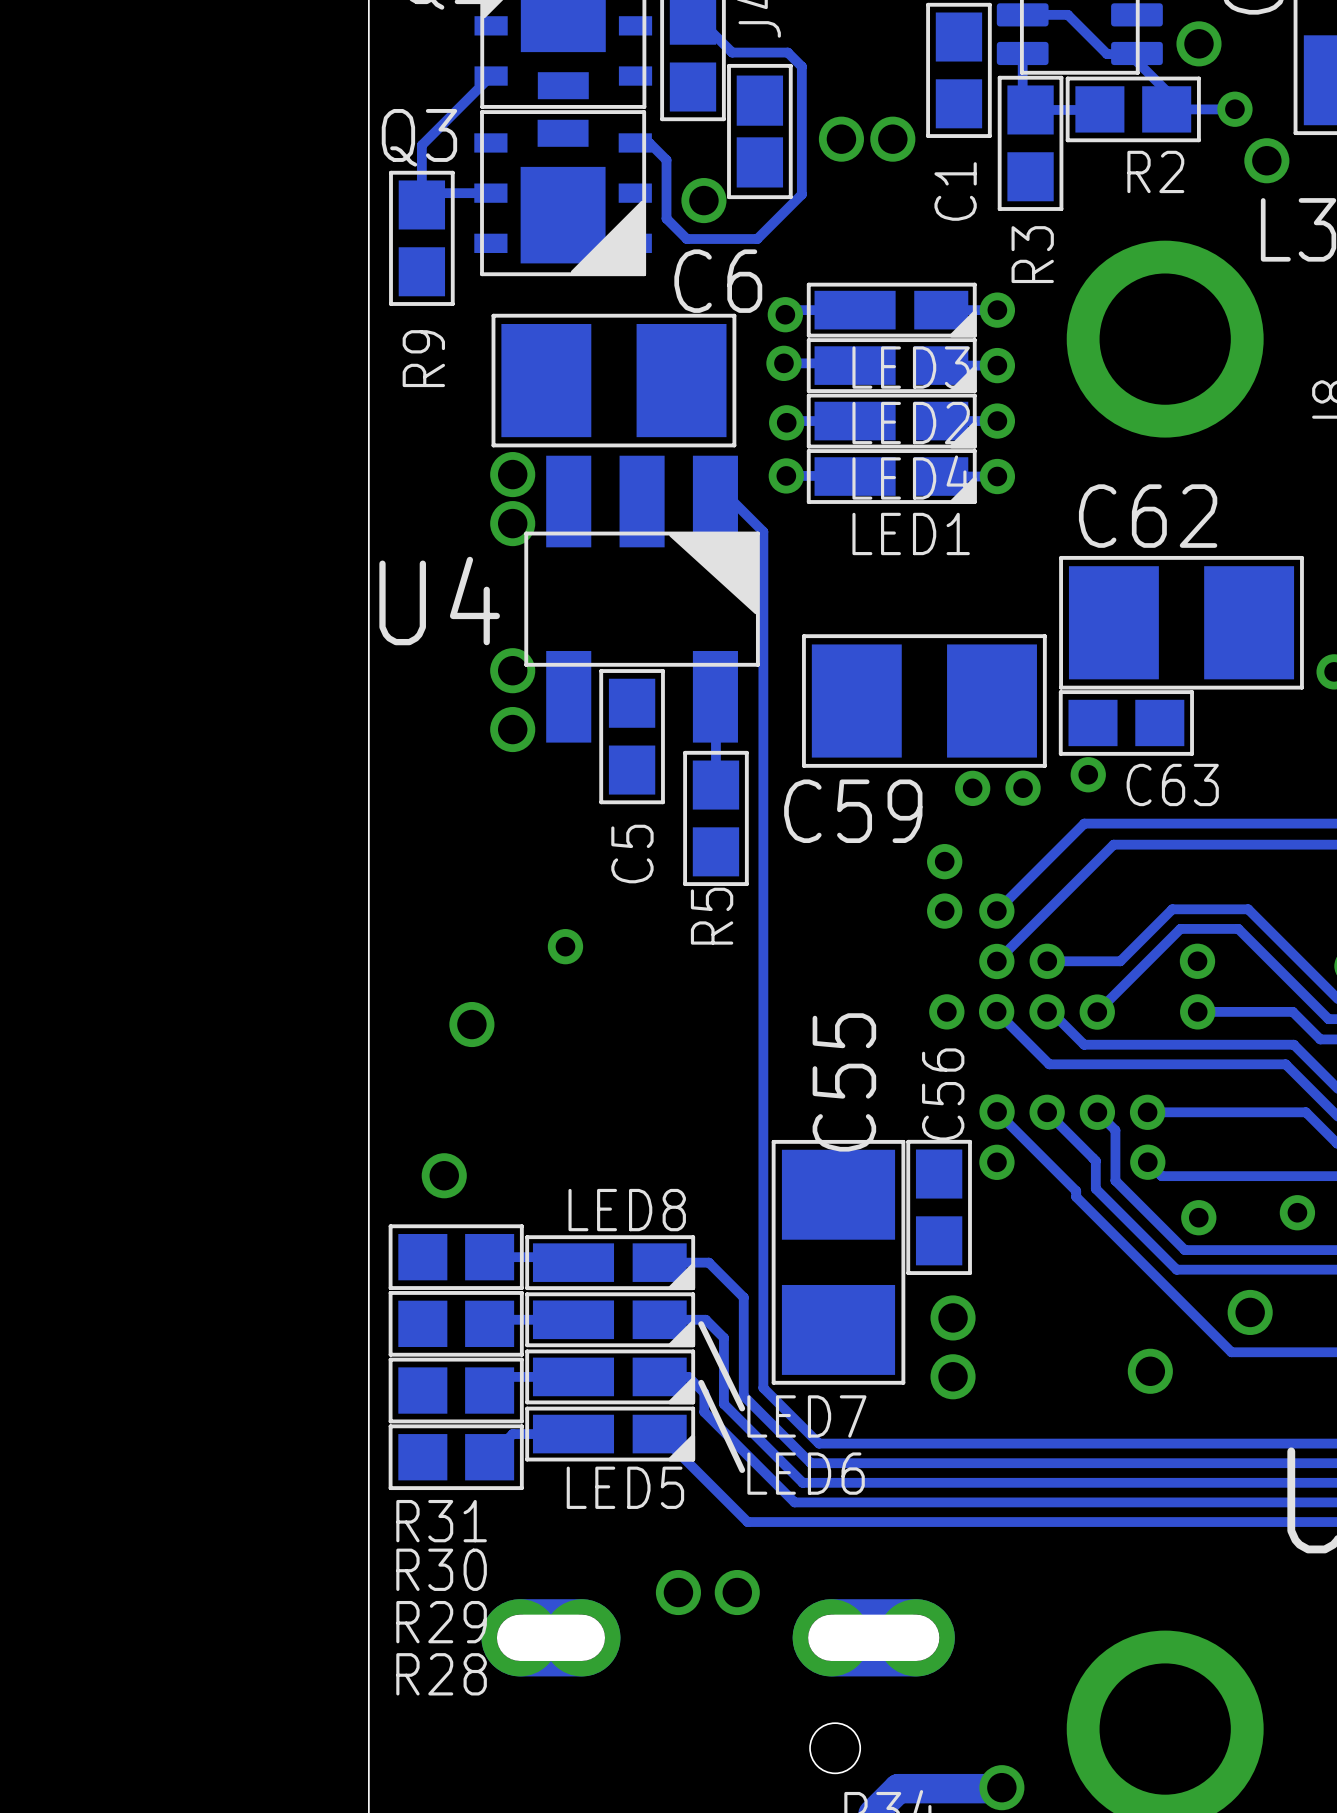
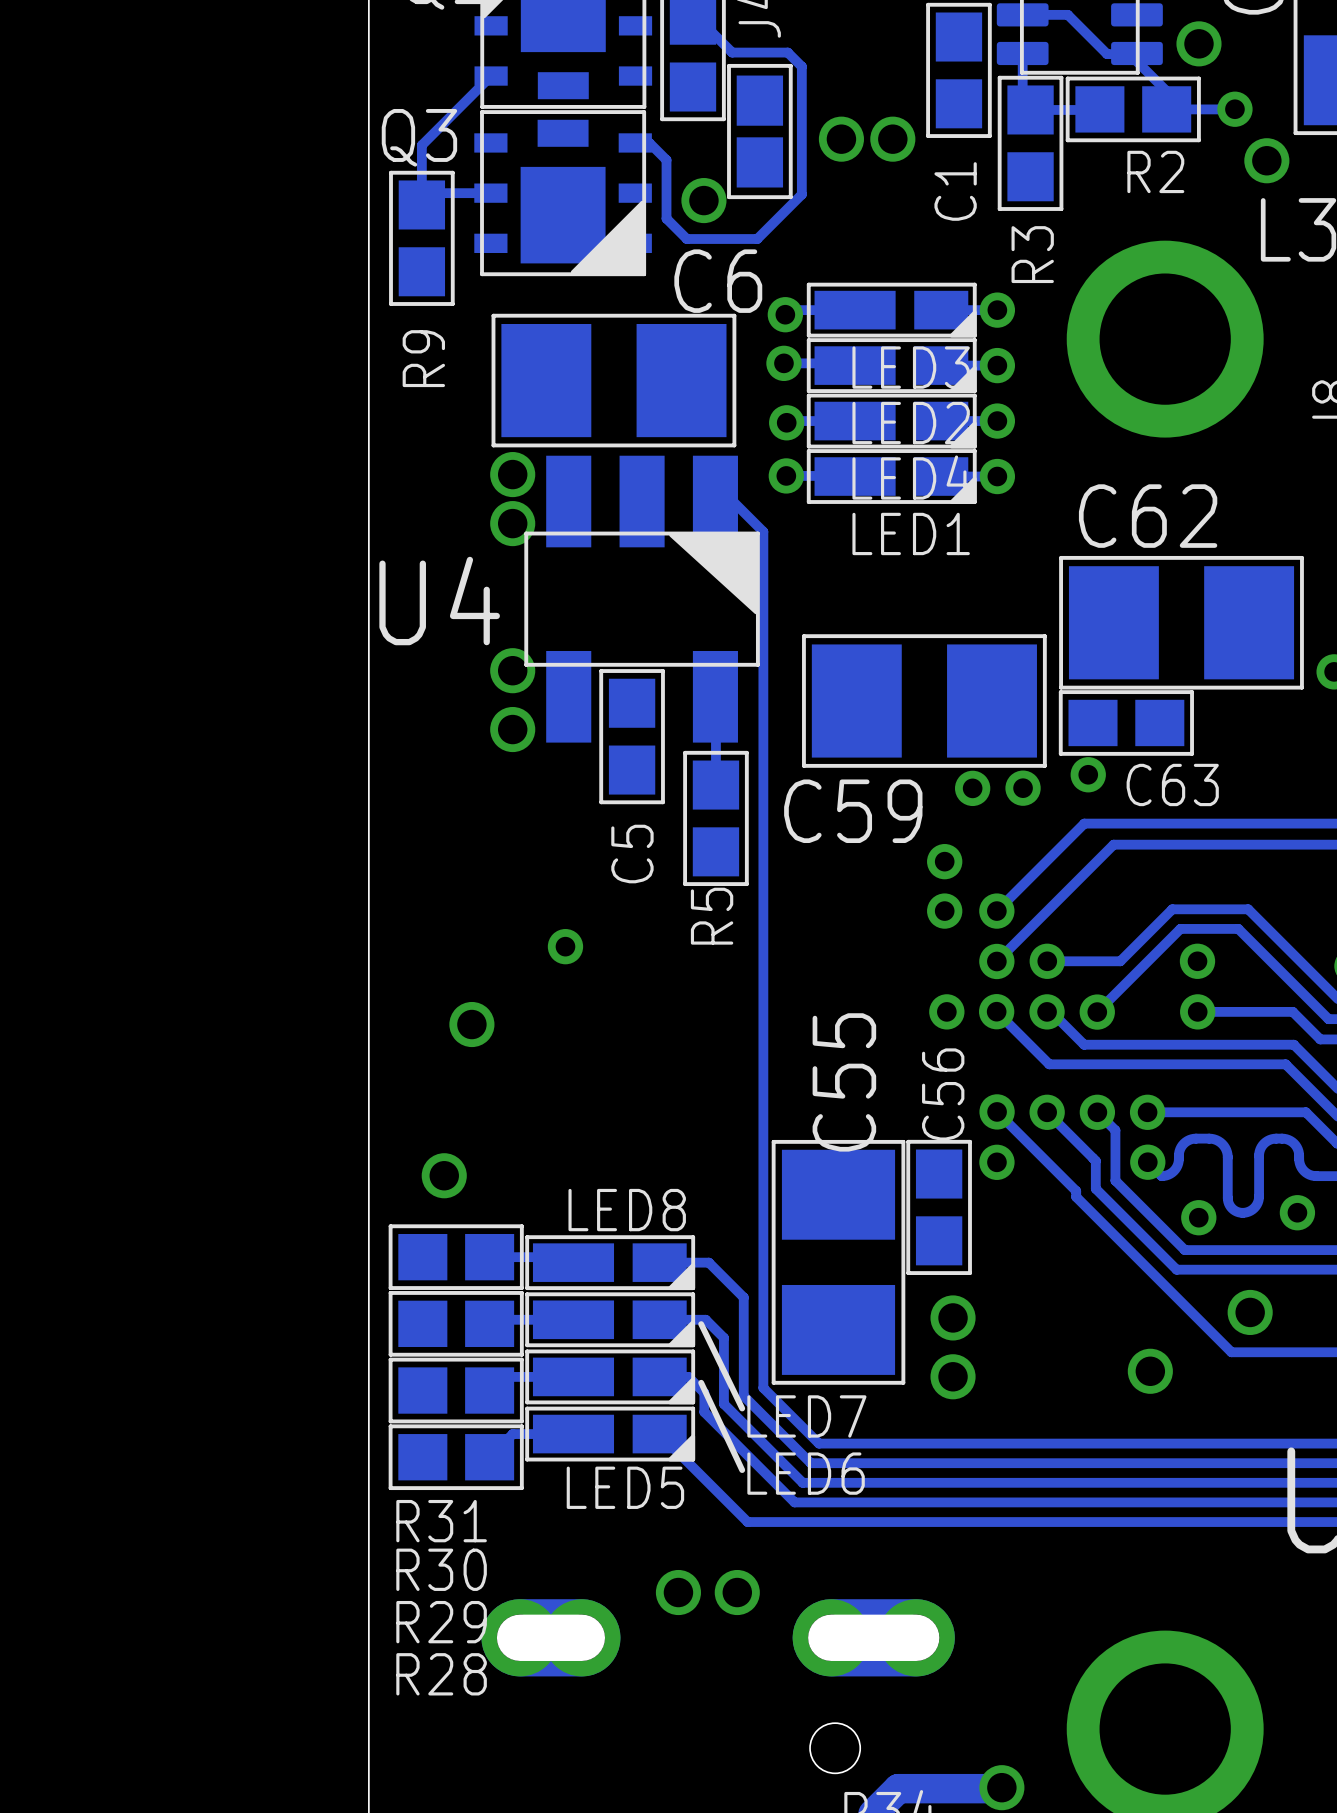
track: (1316, 1176) (1161, 1176) -> (1316, 1176) (1307, 1173) (1302, 1169) (1299, 1163) (1298, 1151) (1294, 1143) (1281, 1138) (1269, 1139) (1260, 1149) (1258, 1200) (1254, 1208) (1246, 1212) (1236, 1211) (1228, 1203) (1227, 1154) (1223, 1145) (1216, 1140) (1196, 1138) (1187, 1140) (1180, 1149) (1175, 1169) (1170, 1173) (1161, 1176)

